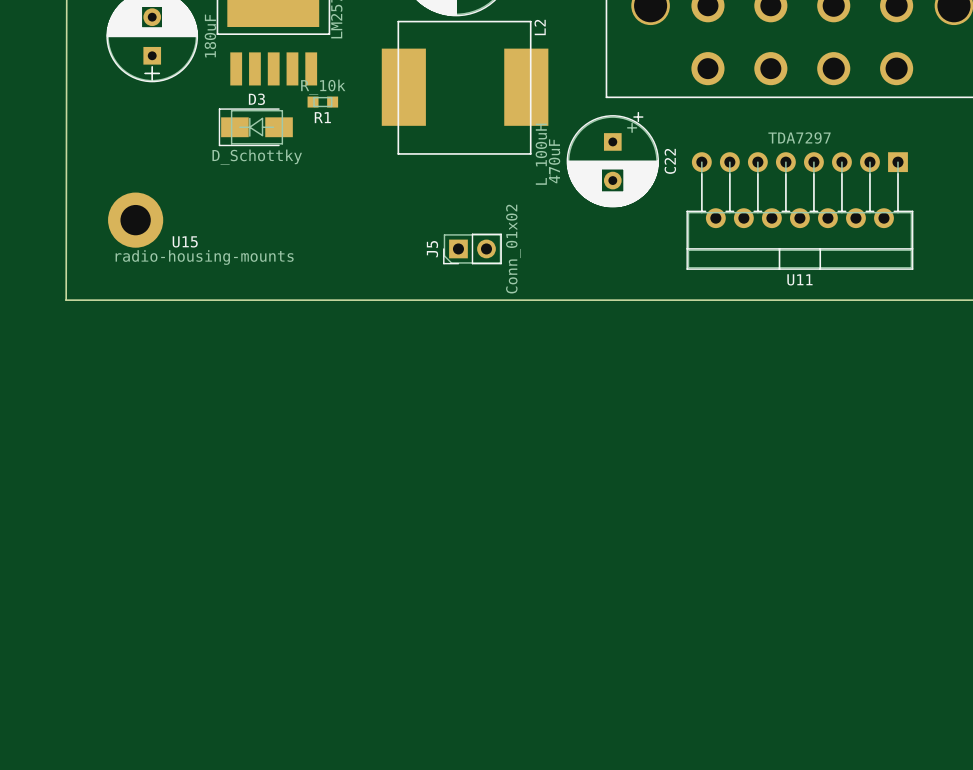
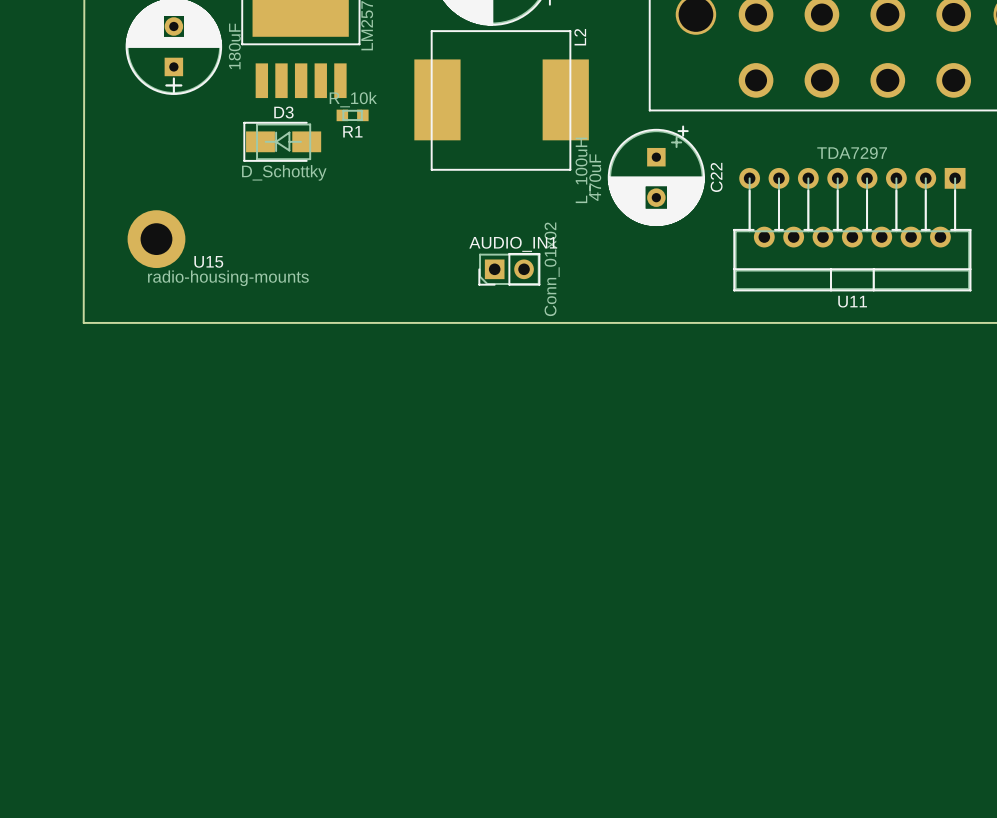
J5 name: J5 (432, 249) -> AUDIO_IN1 (513, 244)

